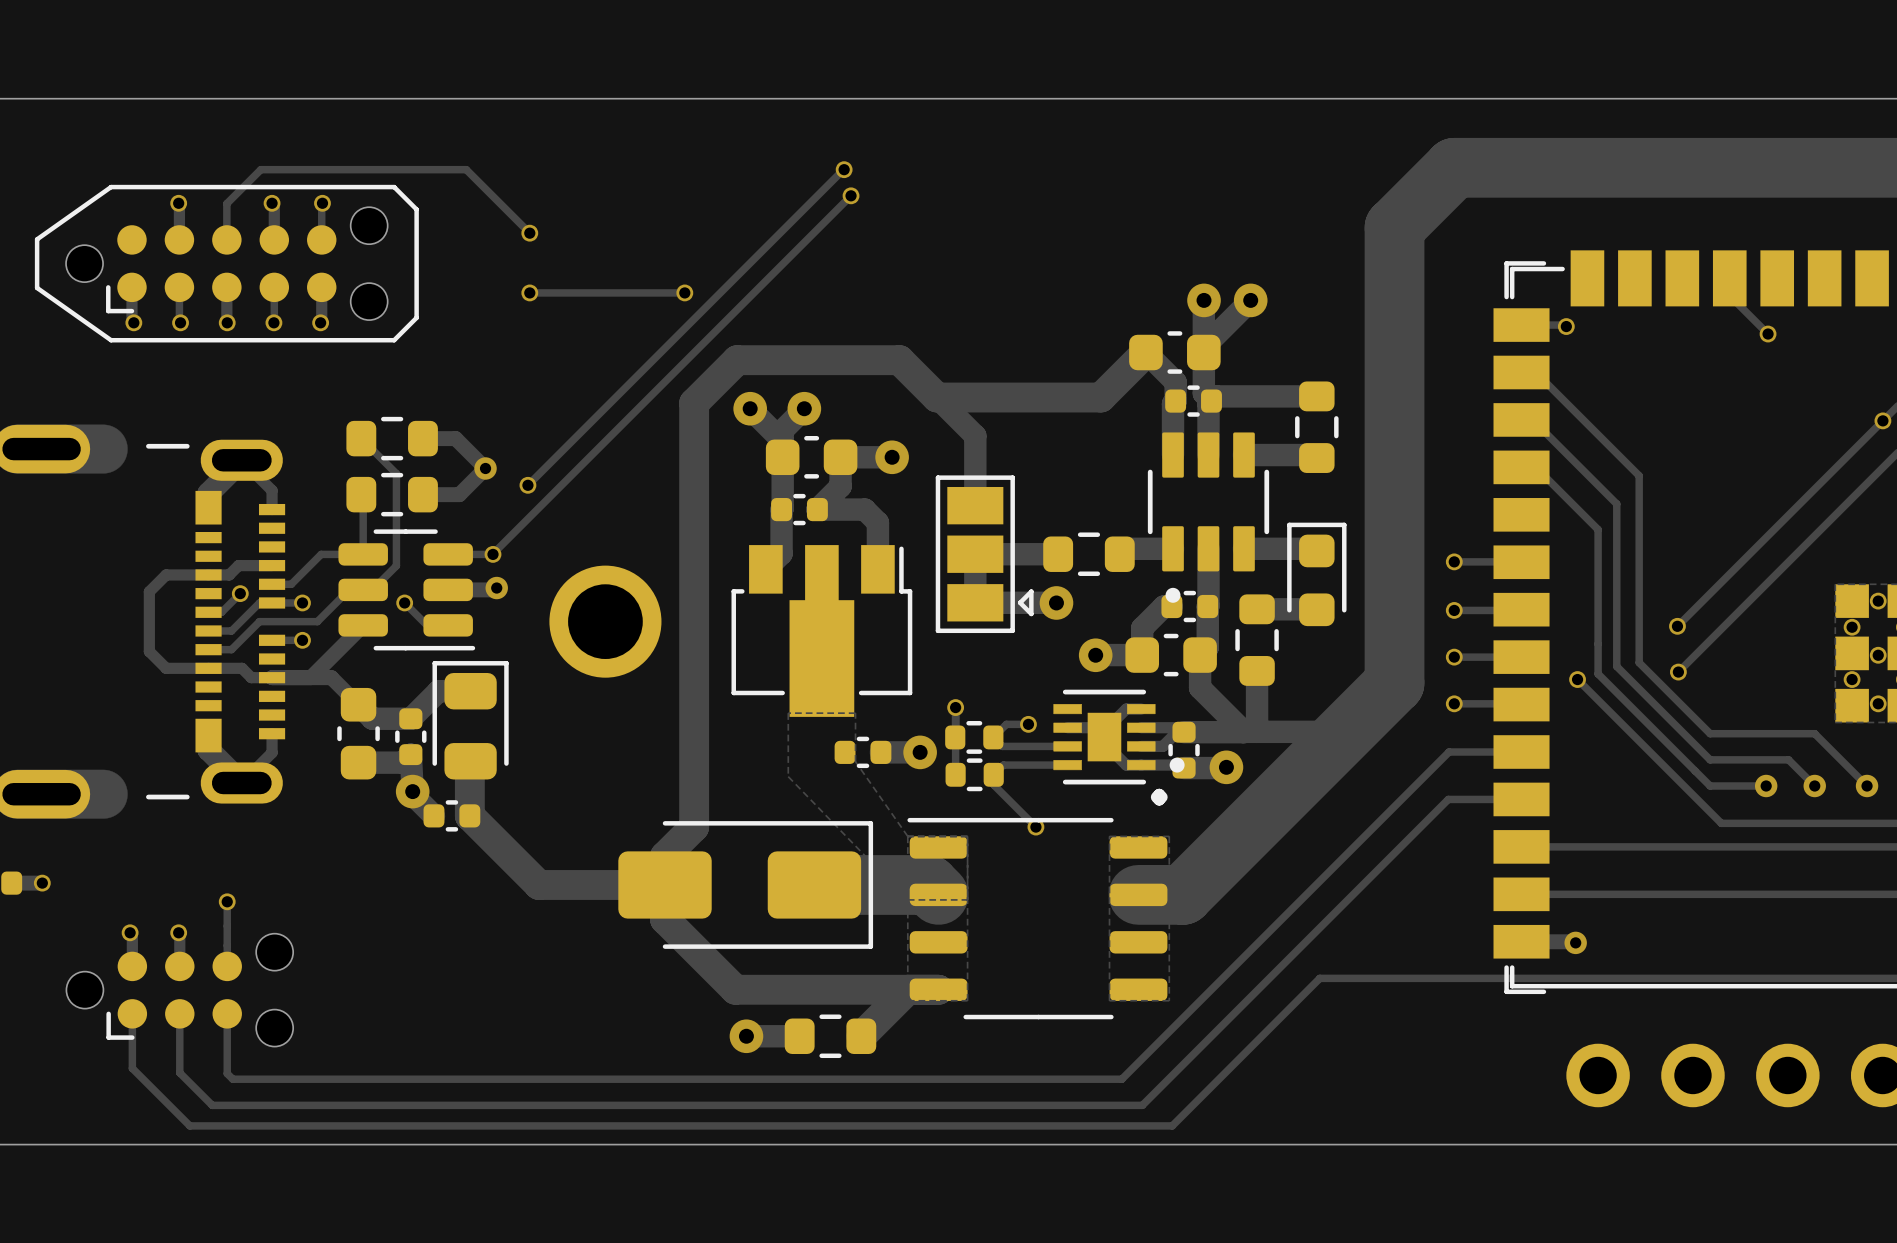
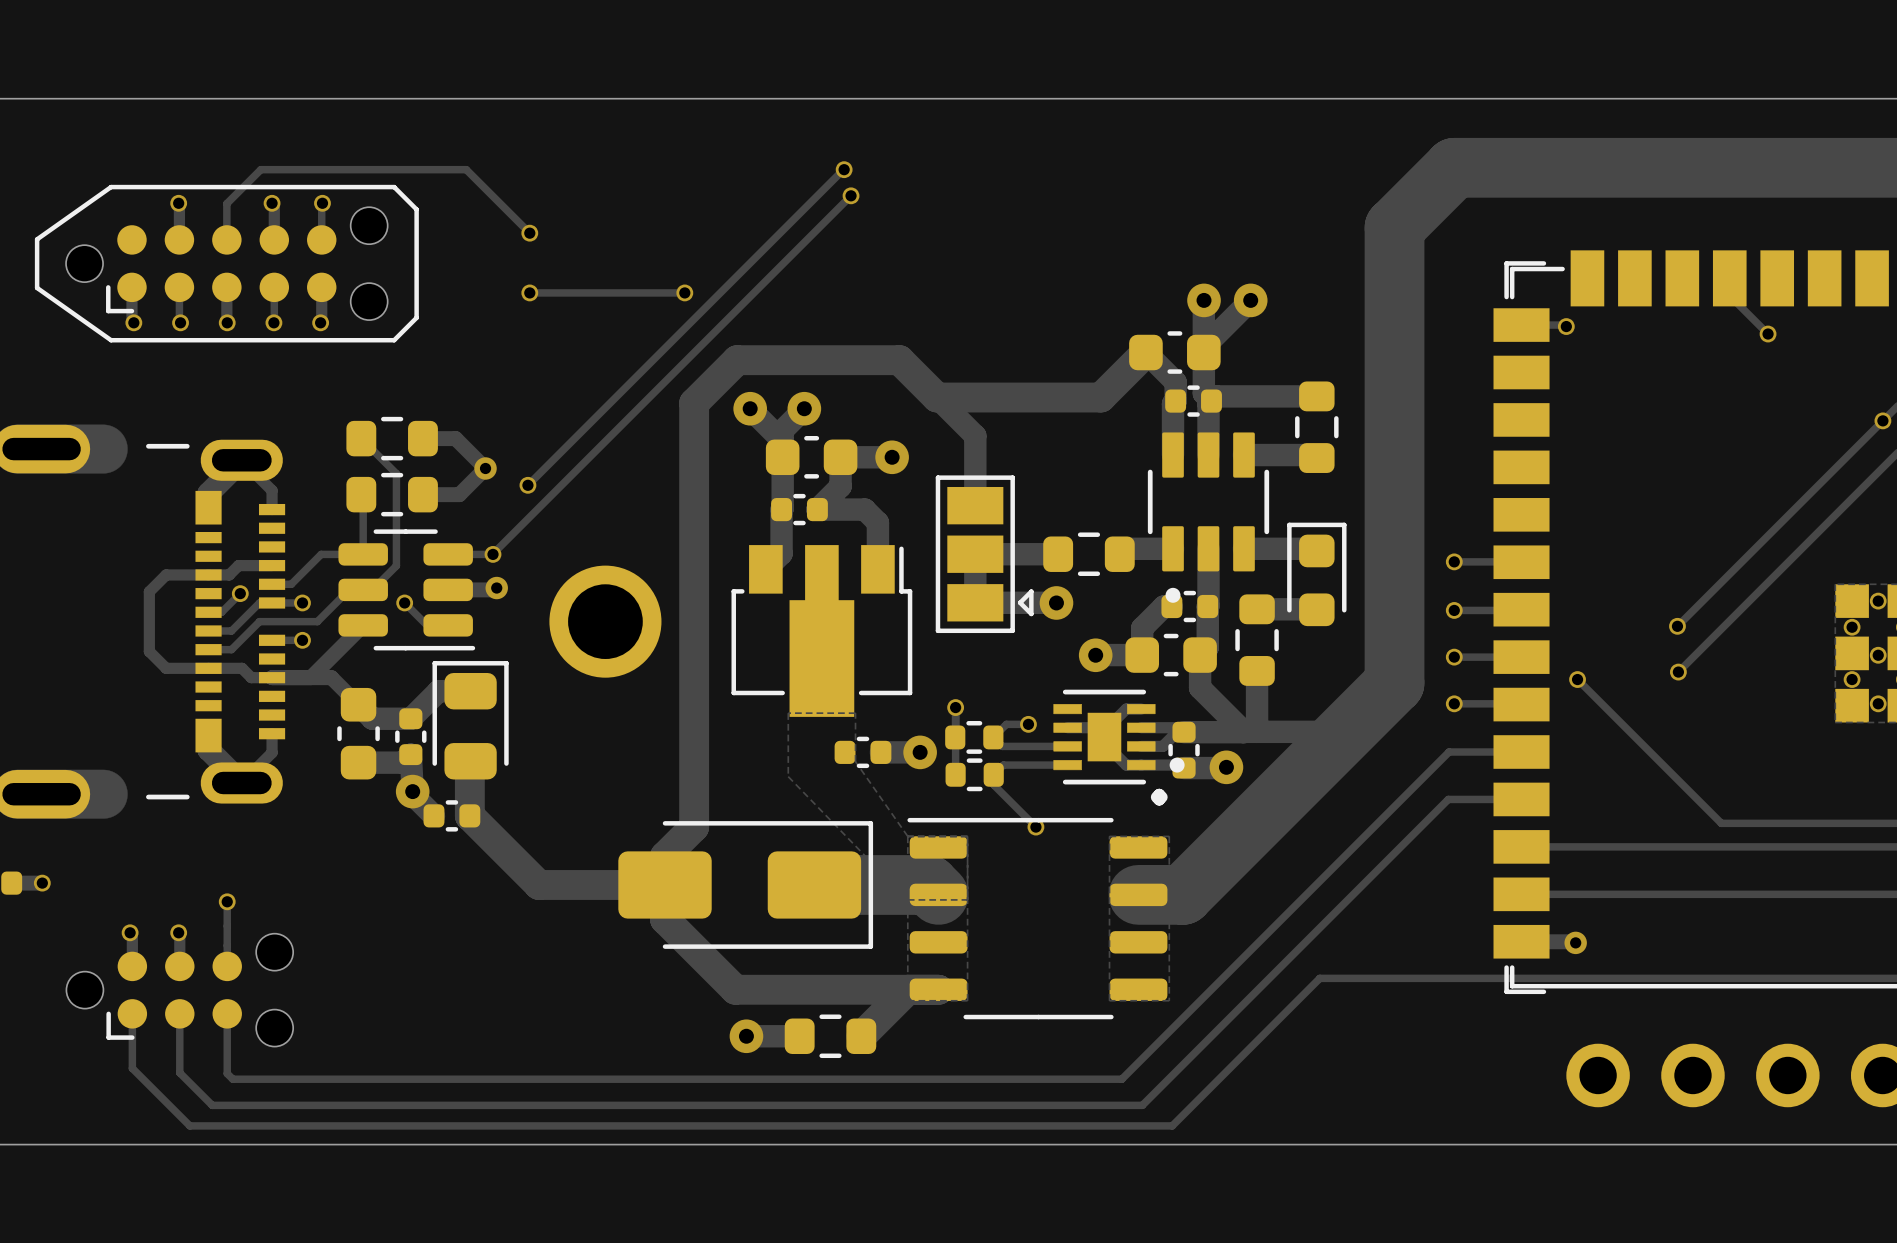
track: (1521, 372) (1535, 372) (1639, 475) (1639, 662) (1710, 733) (1814, 733) (1867, 786) -> none
track: (1521, 419) (1532, 419) (1616, 503) (1616, 666) (1710, 759) (1788, 759) (1814, 786) -> none
track: (1521, 467) (1535, 467) (1598, 529) (1598, 673) (1710, 786) (1766, 786) -> none
via: (1766, 786) -> none
via: (1814, 786) -> none
via: (1867, 786) -> none

